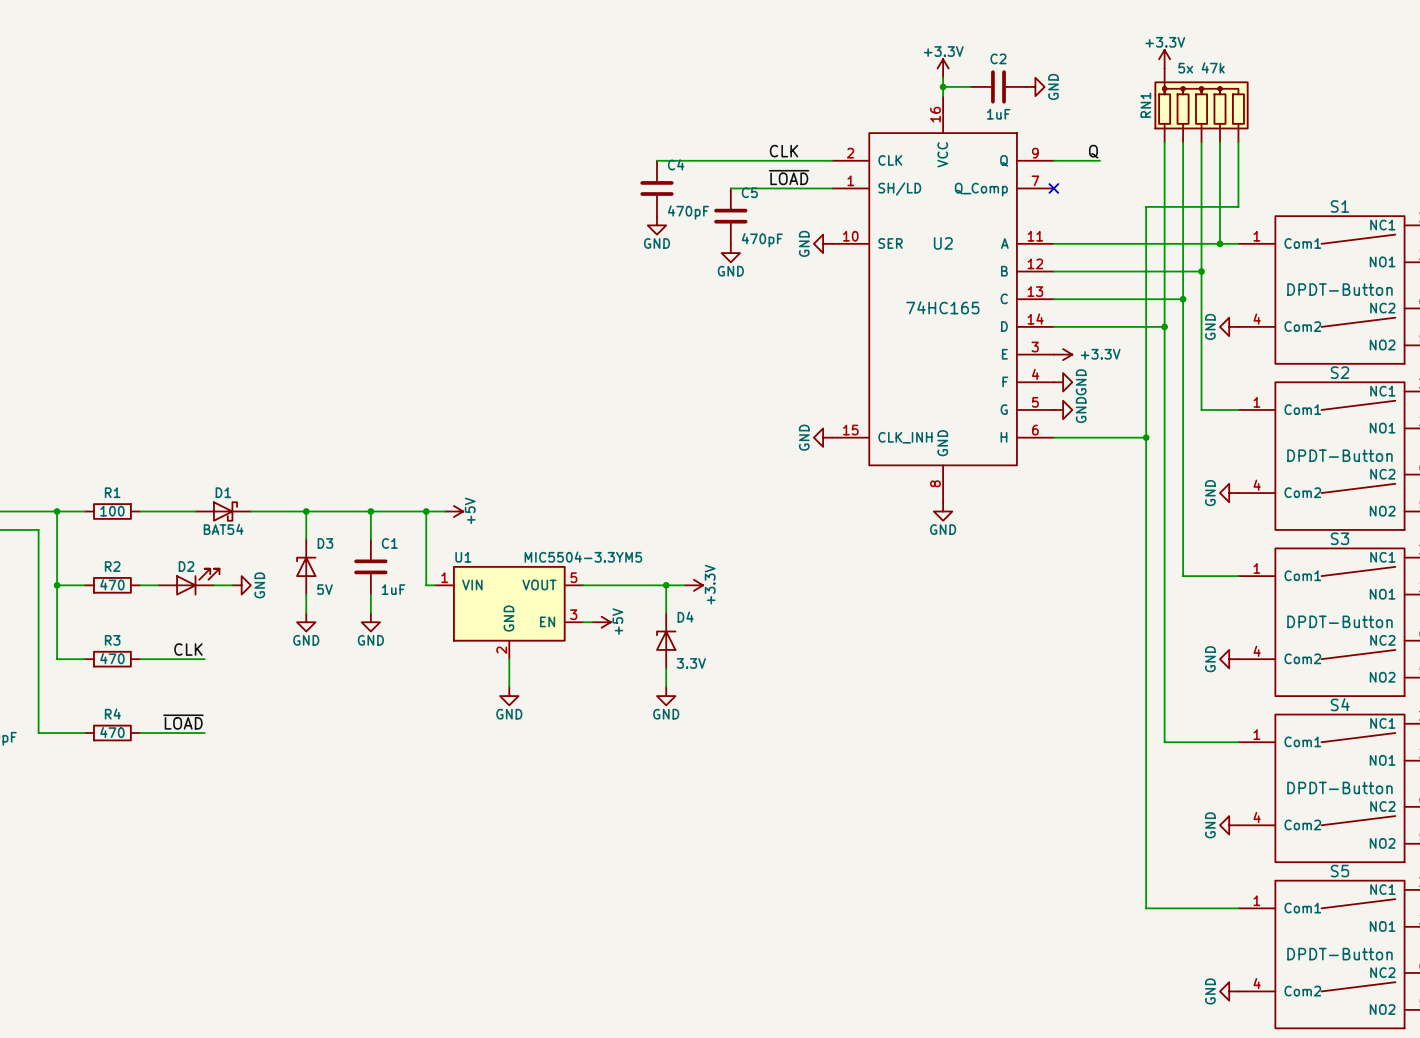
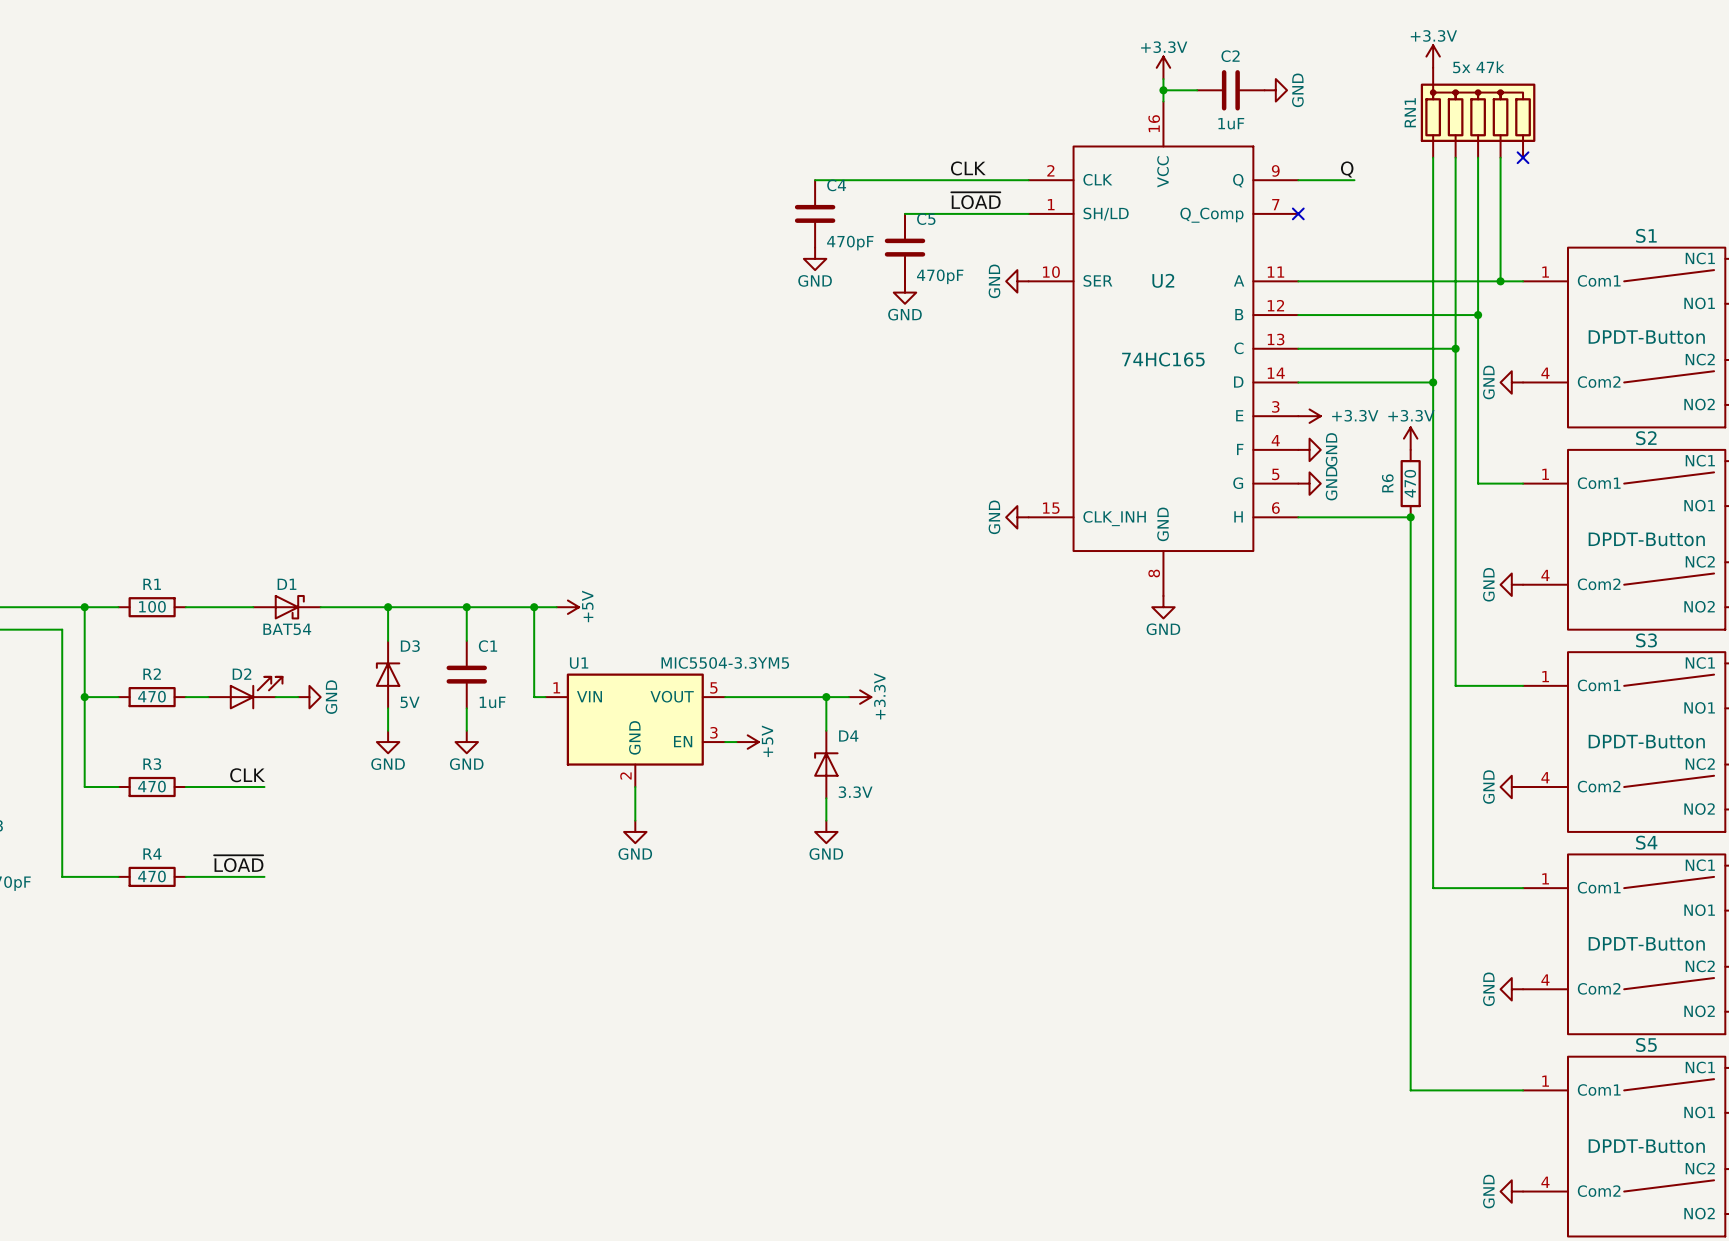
wire: (1238, 142) (1238, 206) (1146, 206) (1146, 437) -> none
no-connect mark: none -> (1523, 157)
power symbol: none -> +3.3V (1410, 438)
R6: none -> 470 (1410, 483)

